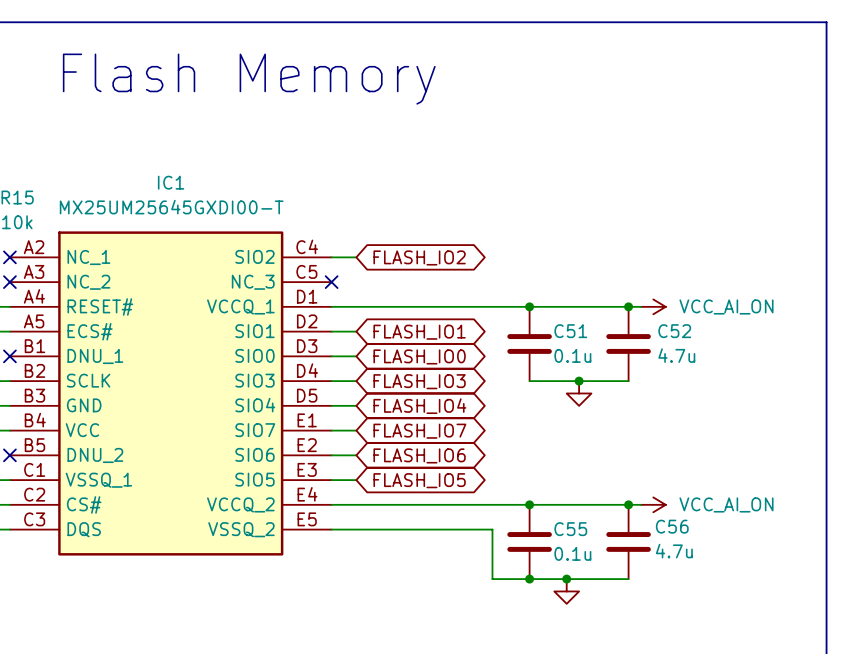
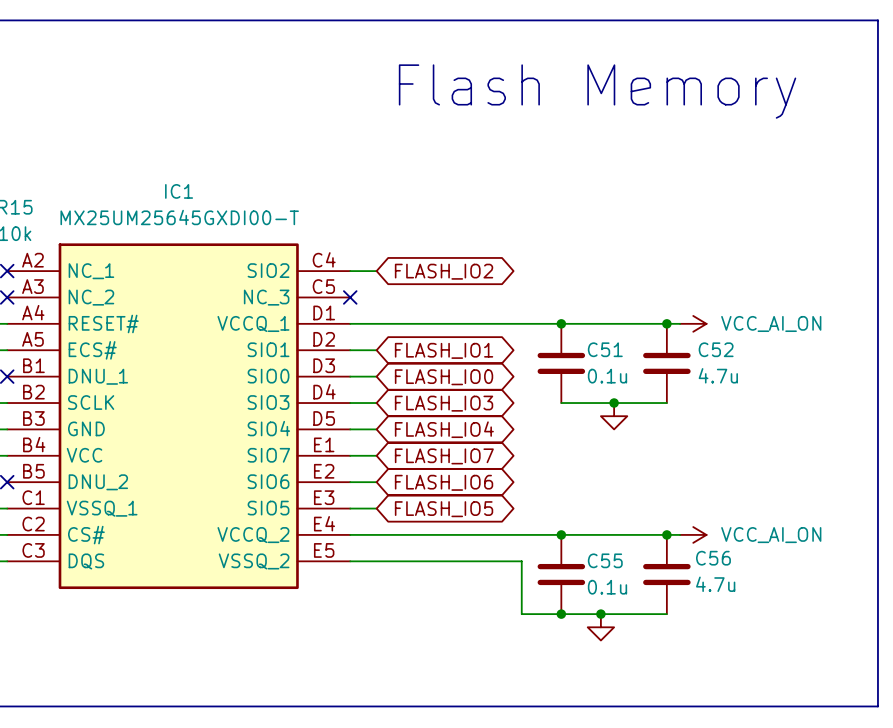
text: Flash Memory (249, 79) -> none
text: none -> Flash Memory (597, 91)

